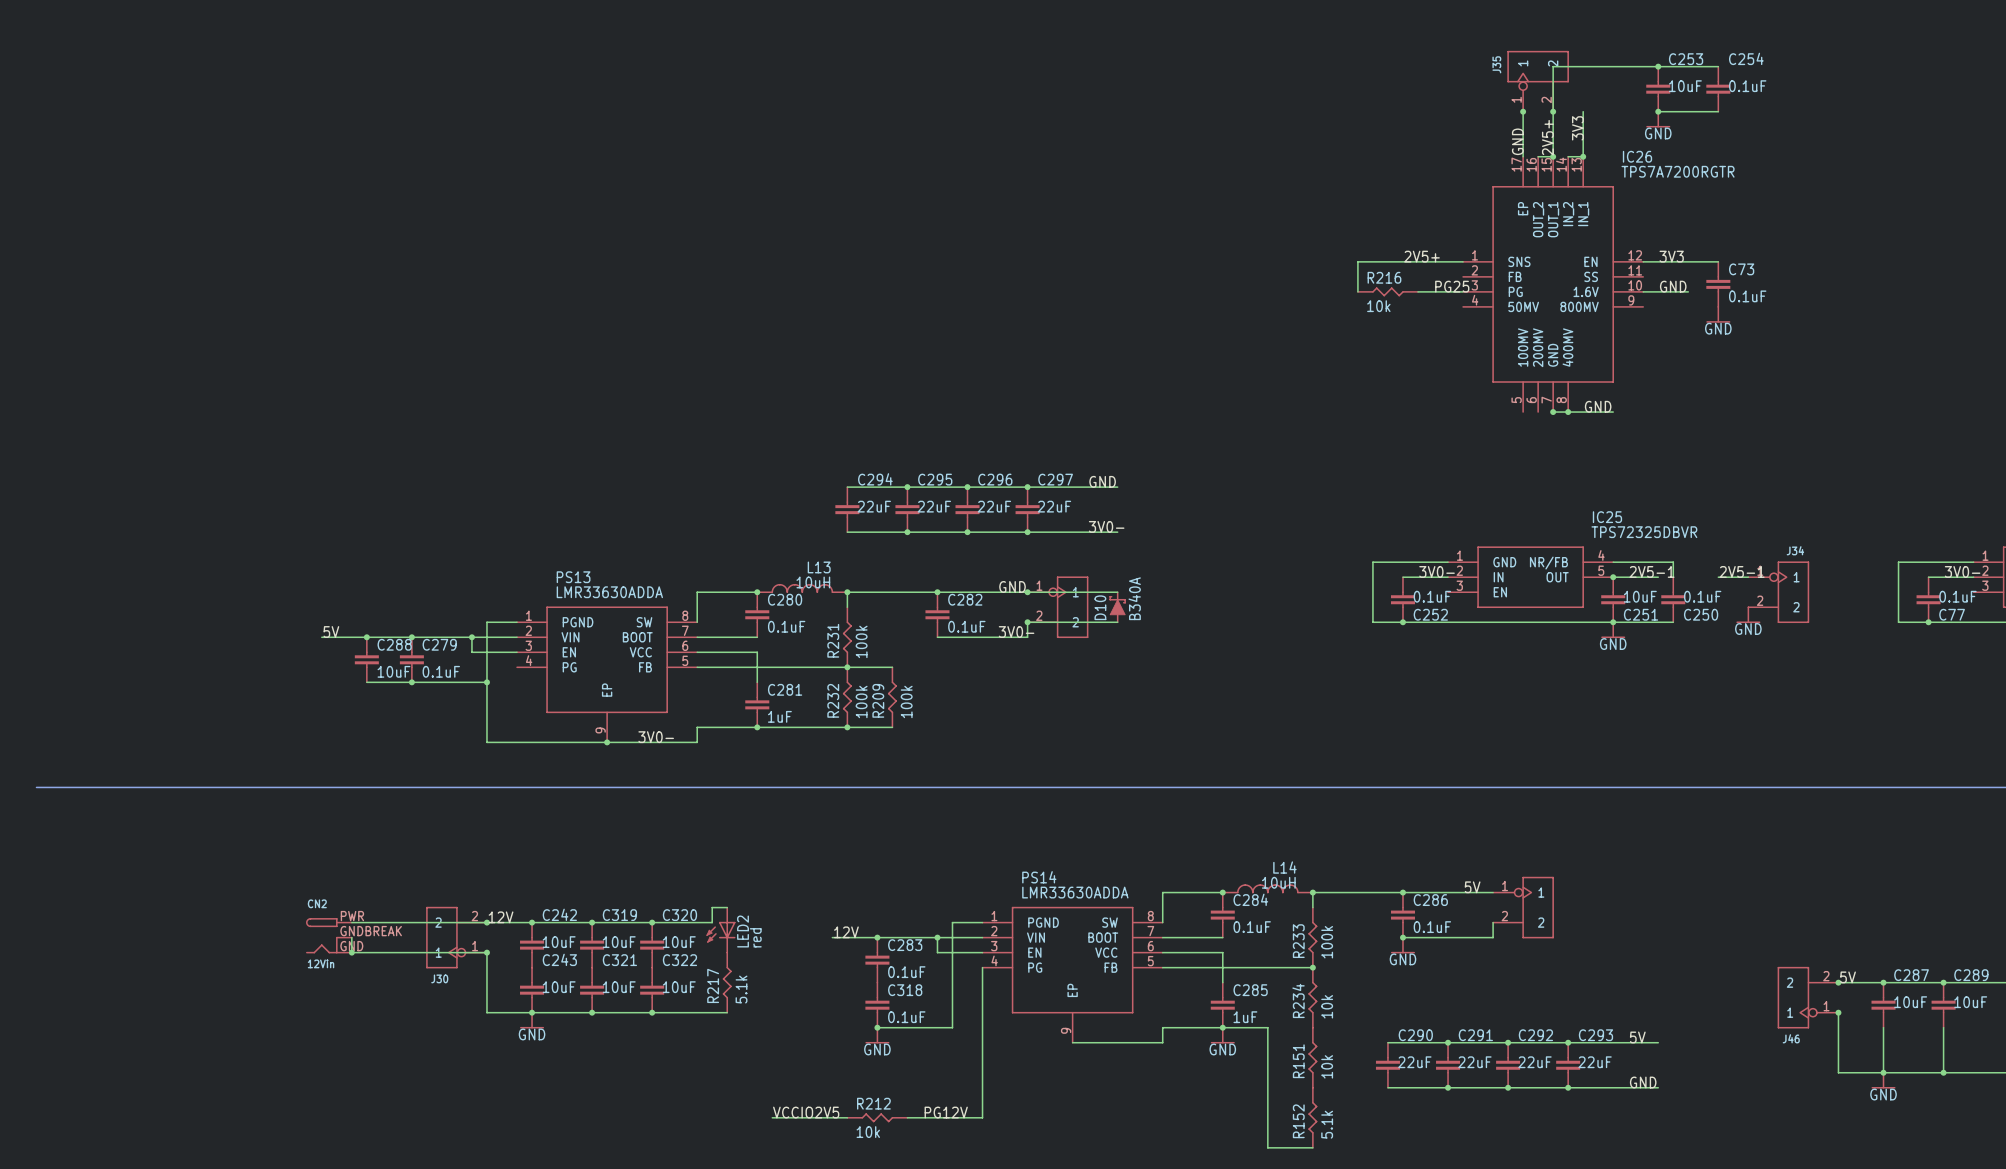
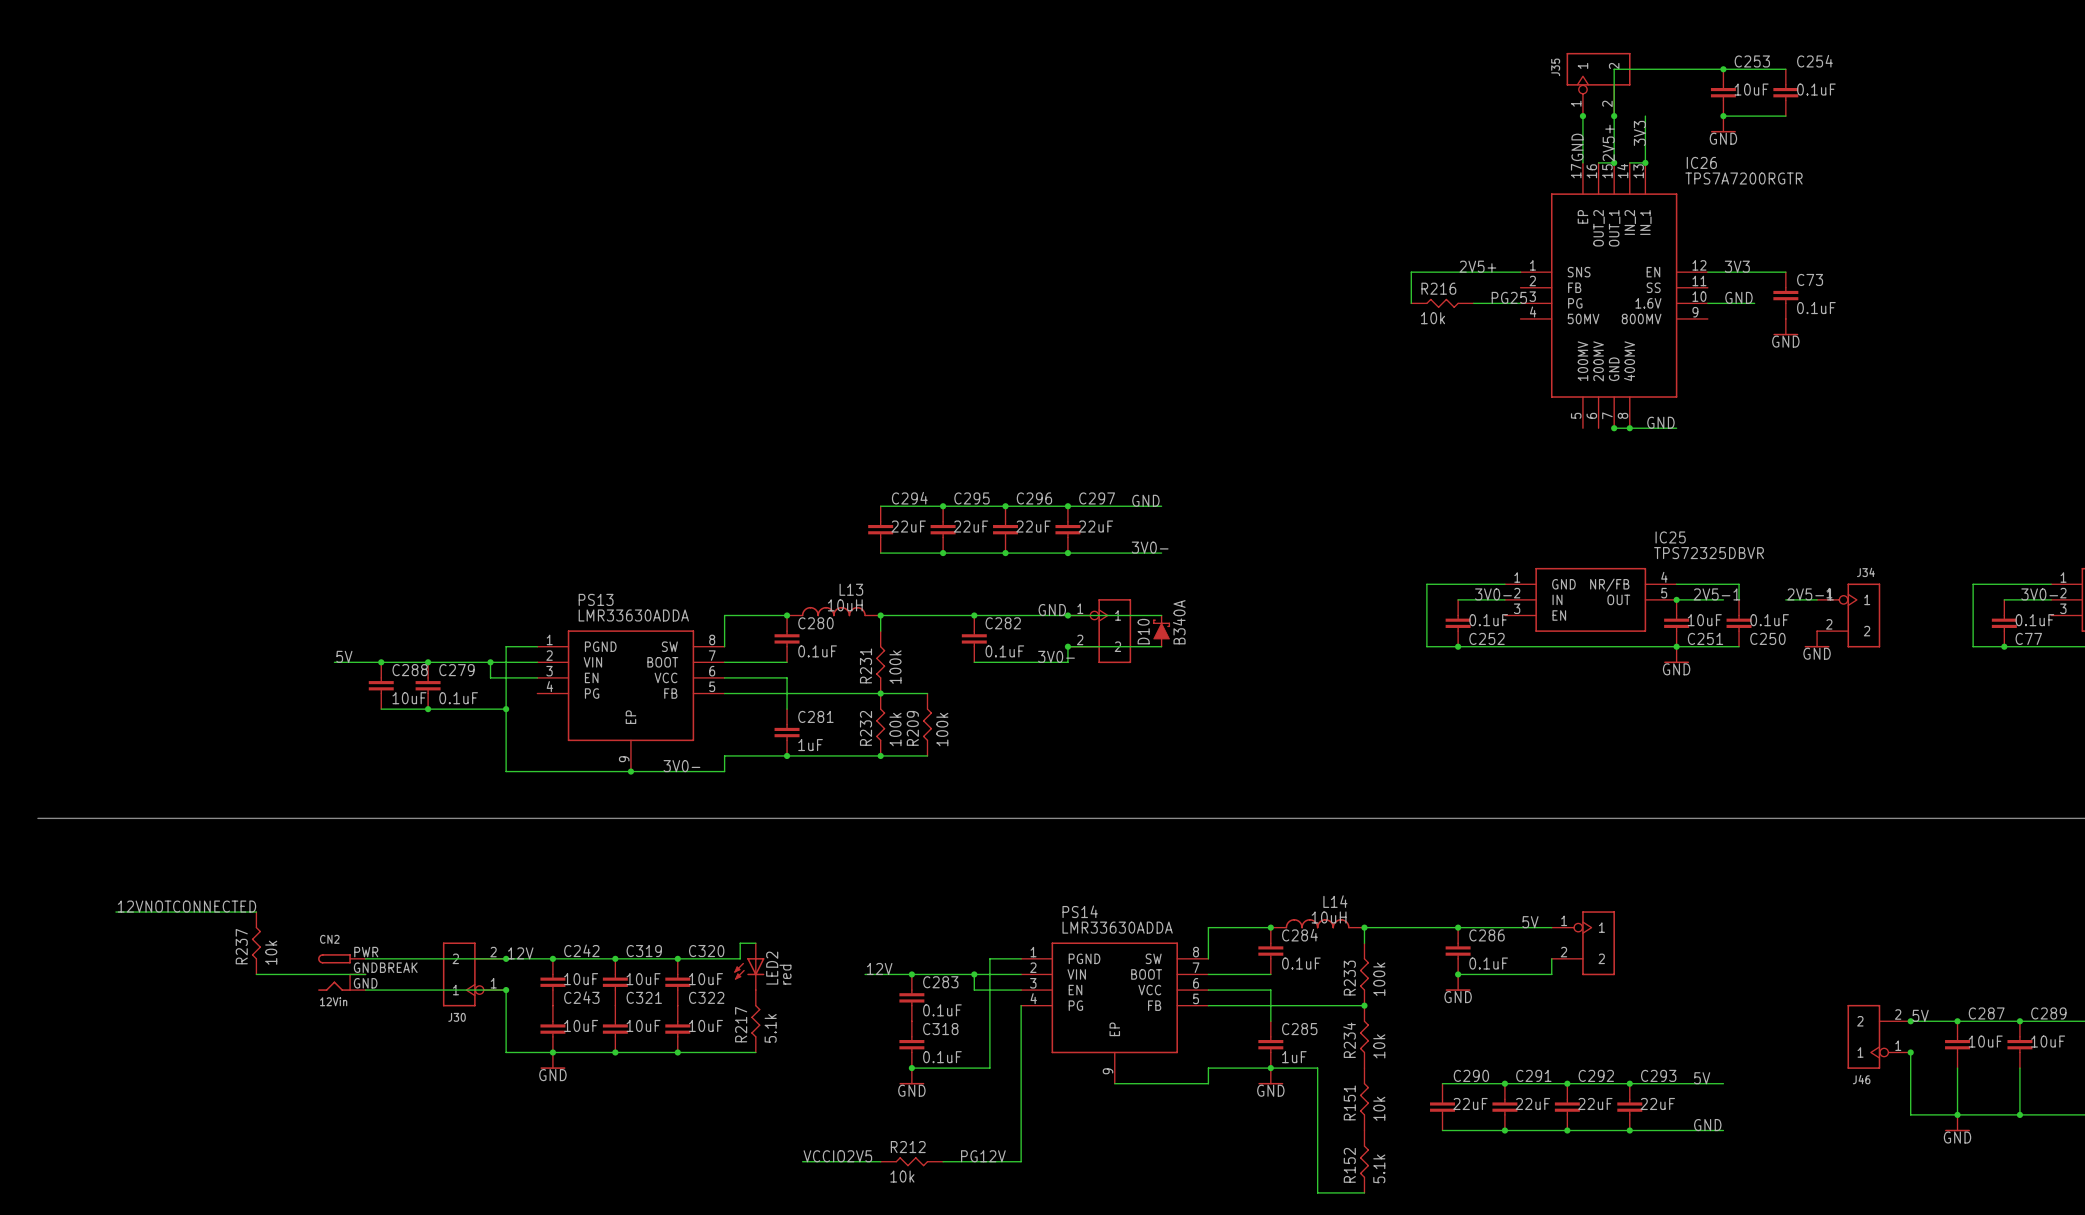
label: none -> 12VNOTCONNECTED (186, 906)
wire: none -> (115, 912) (256, 912)
R237: none -> 10k (256, 943)
wire: (351, 937) (351, 952) -> (365, 974) (256, 974)
junction: (351, 952) -> none

